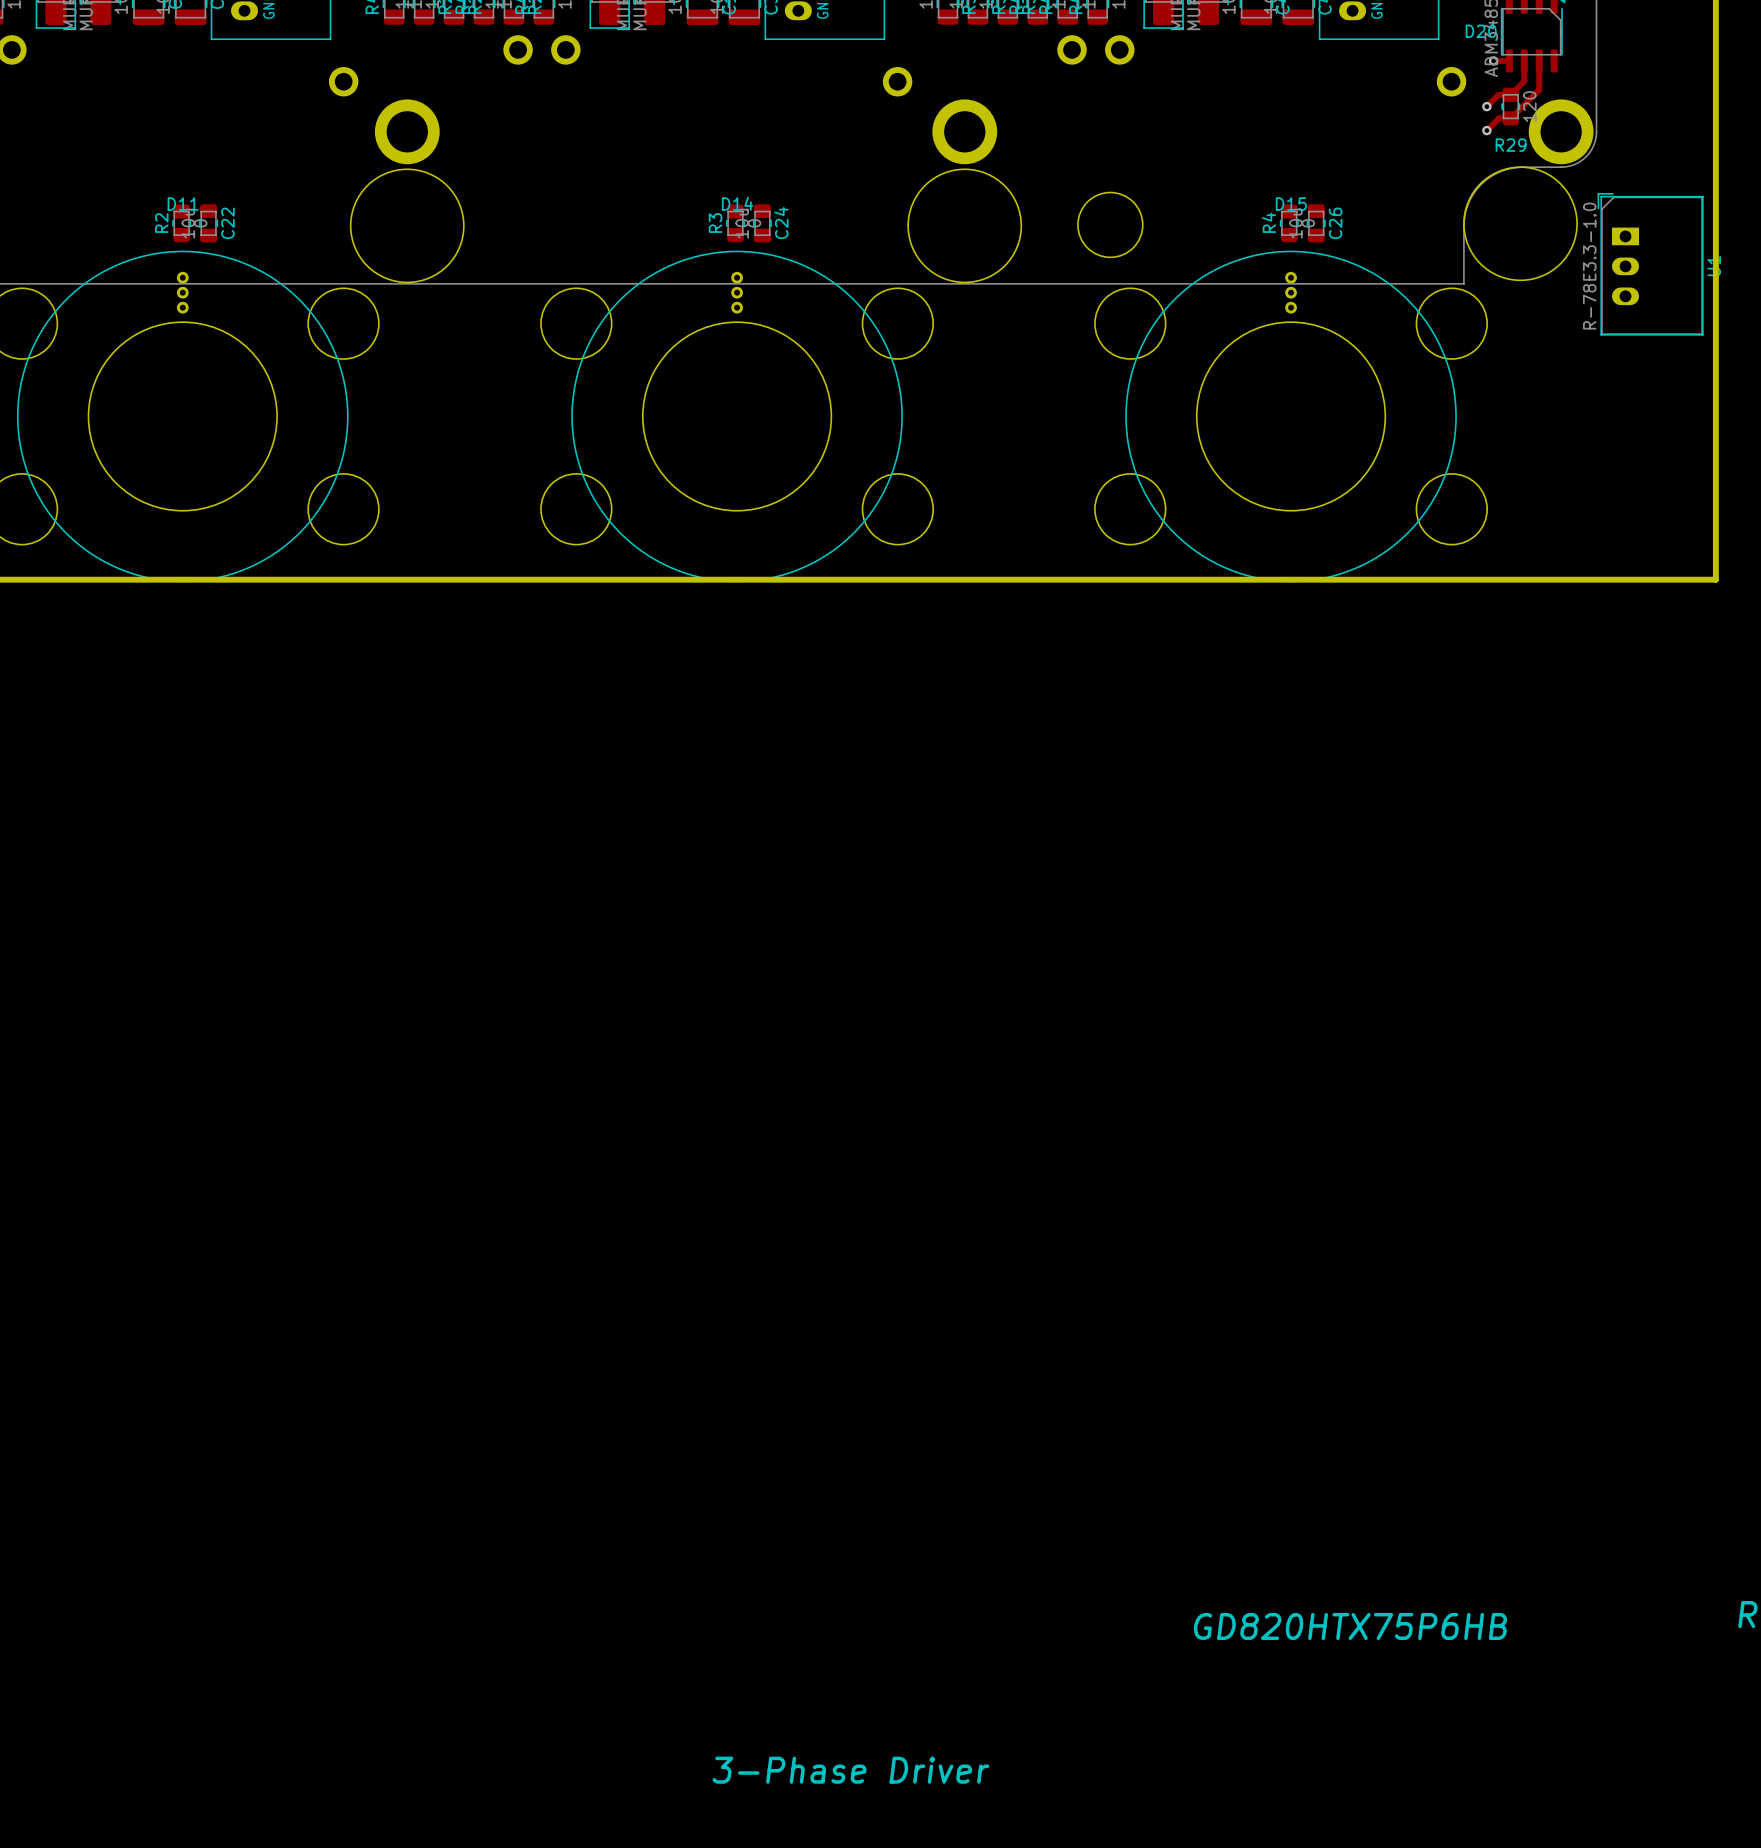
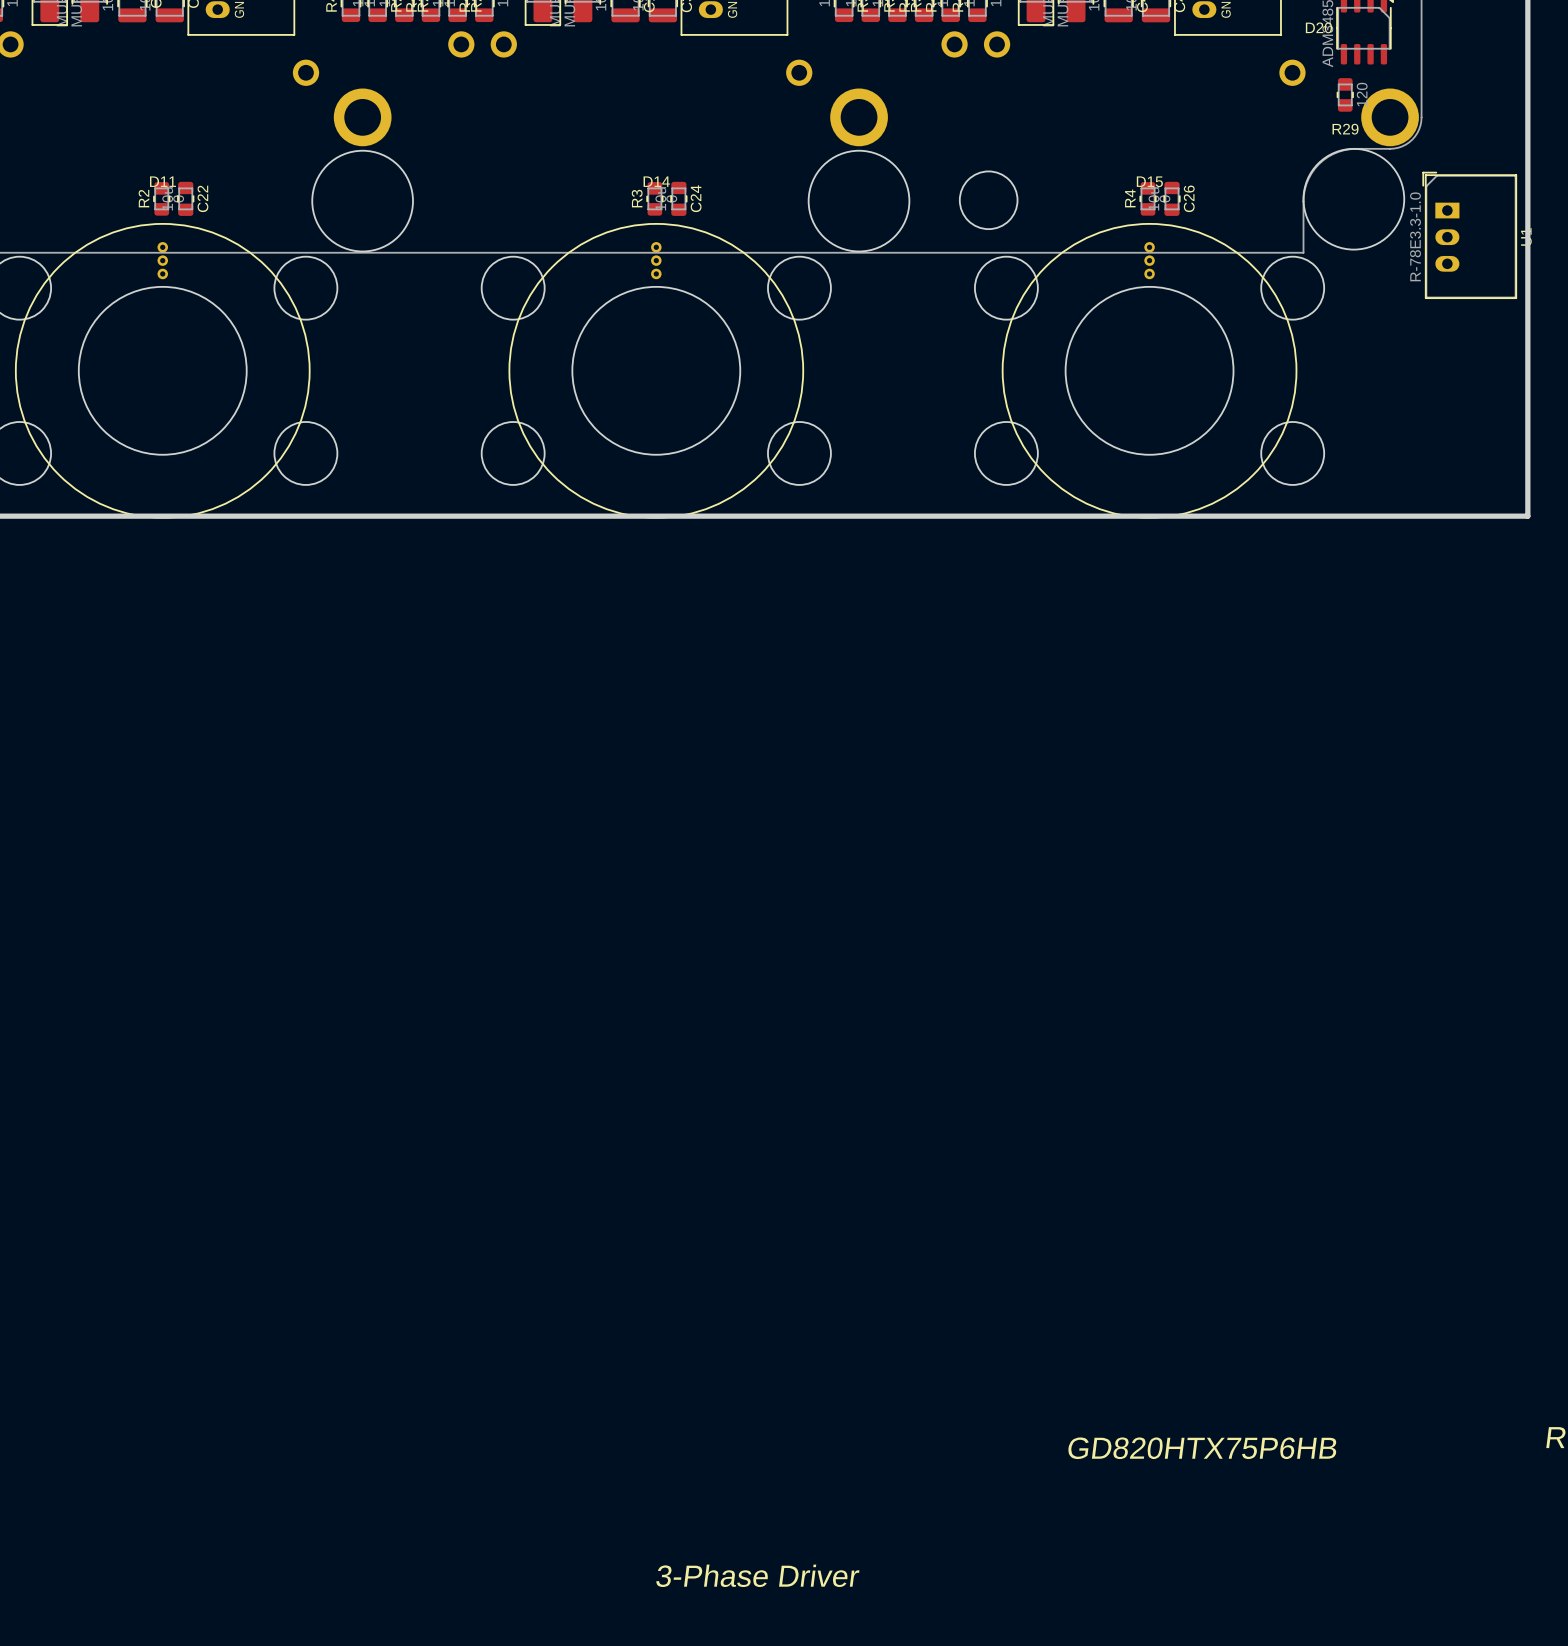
track: (1493, 60) (1509, 60) -> none
via: (1493, 60) -> none
track: (1524, 60) (1524, 81) (1510, 94) (1498, 94) (1486, 106) -> none
track: (1539, 60) (1539, 89) (1510, 118) (1499, 118) (1486, 130) -> none
via: (1486, 106) -> none
via: (1486, 130) -> none

